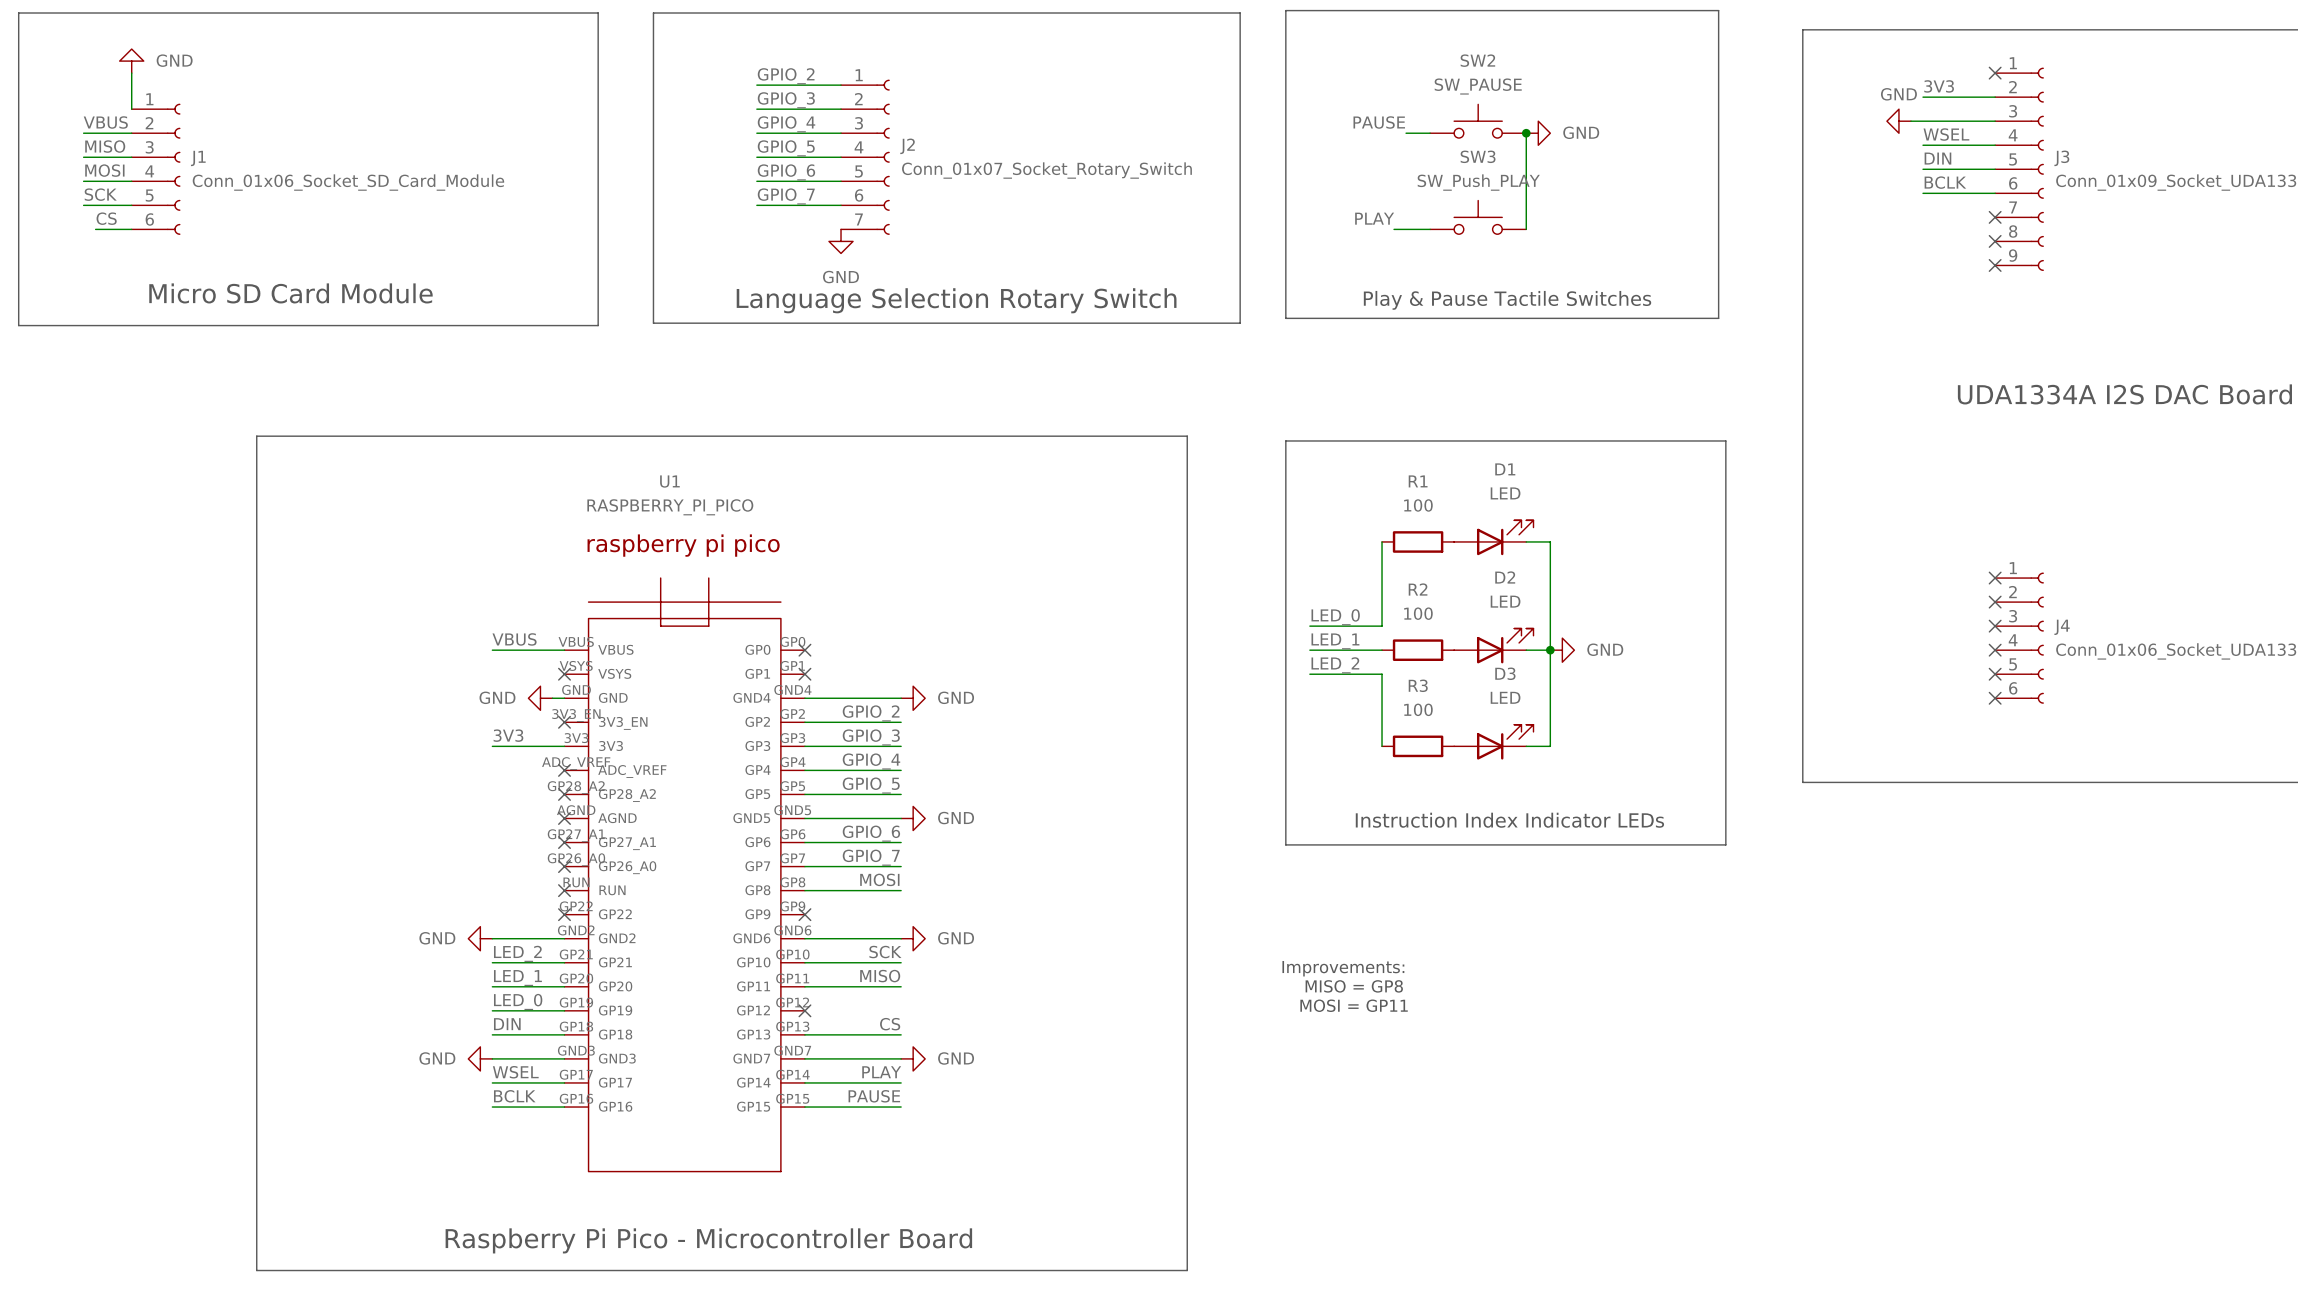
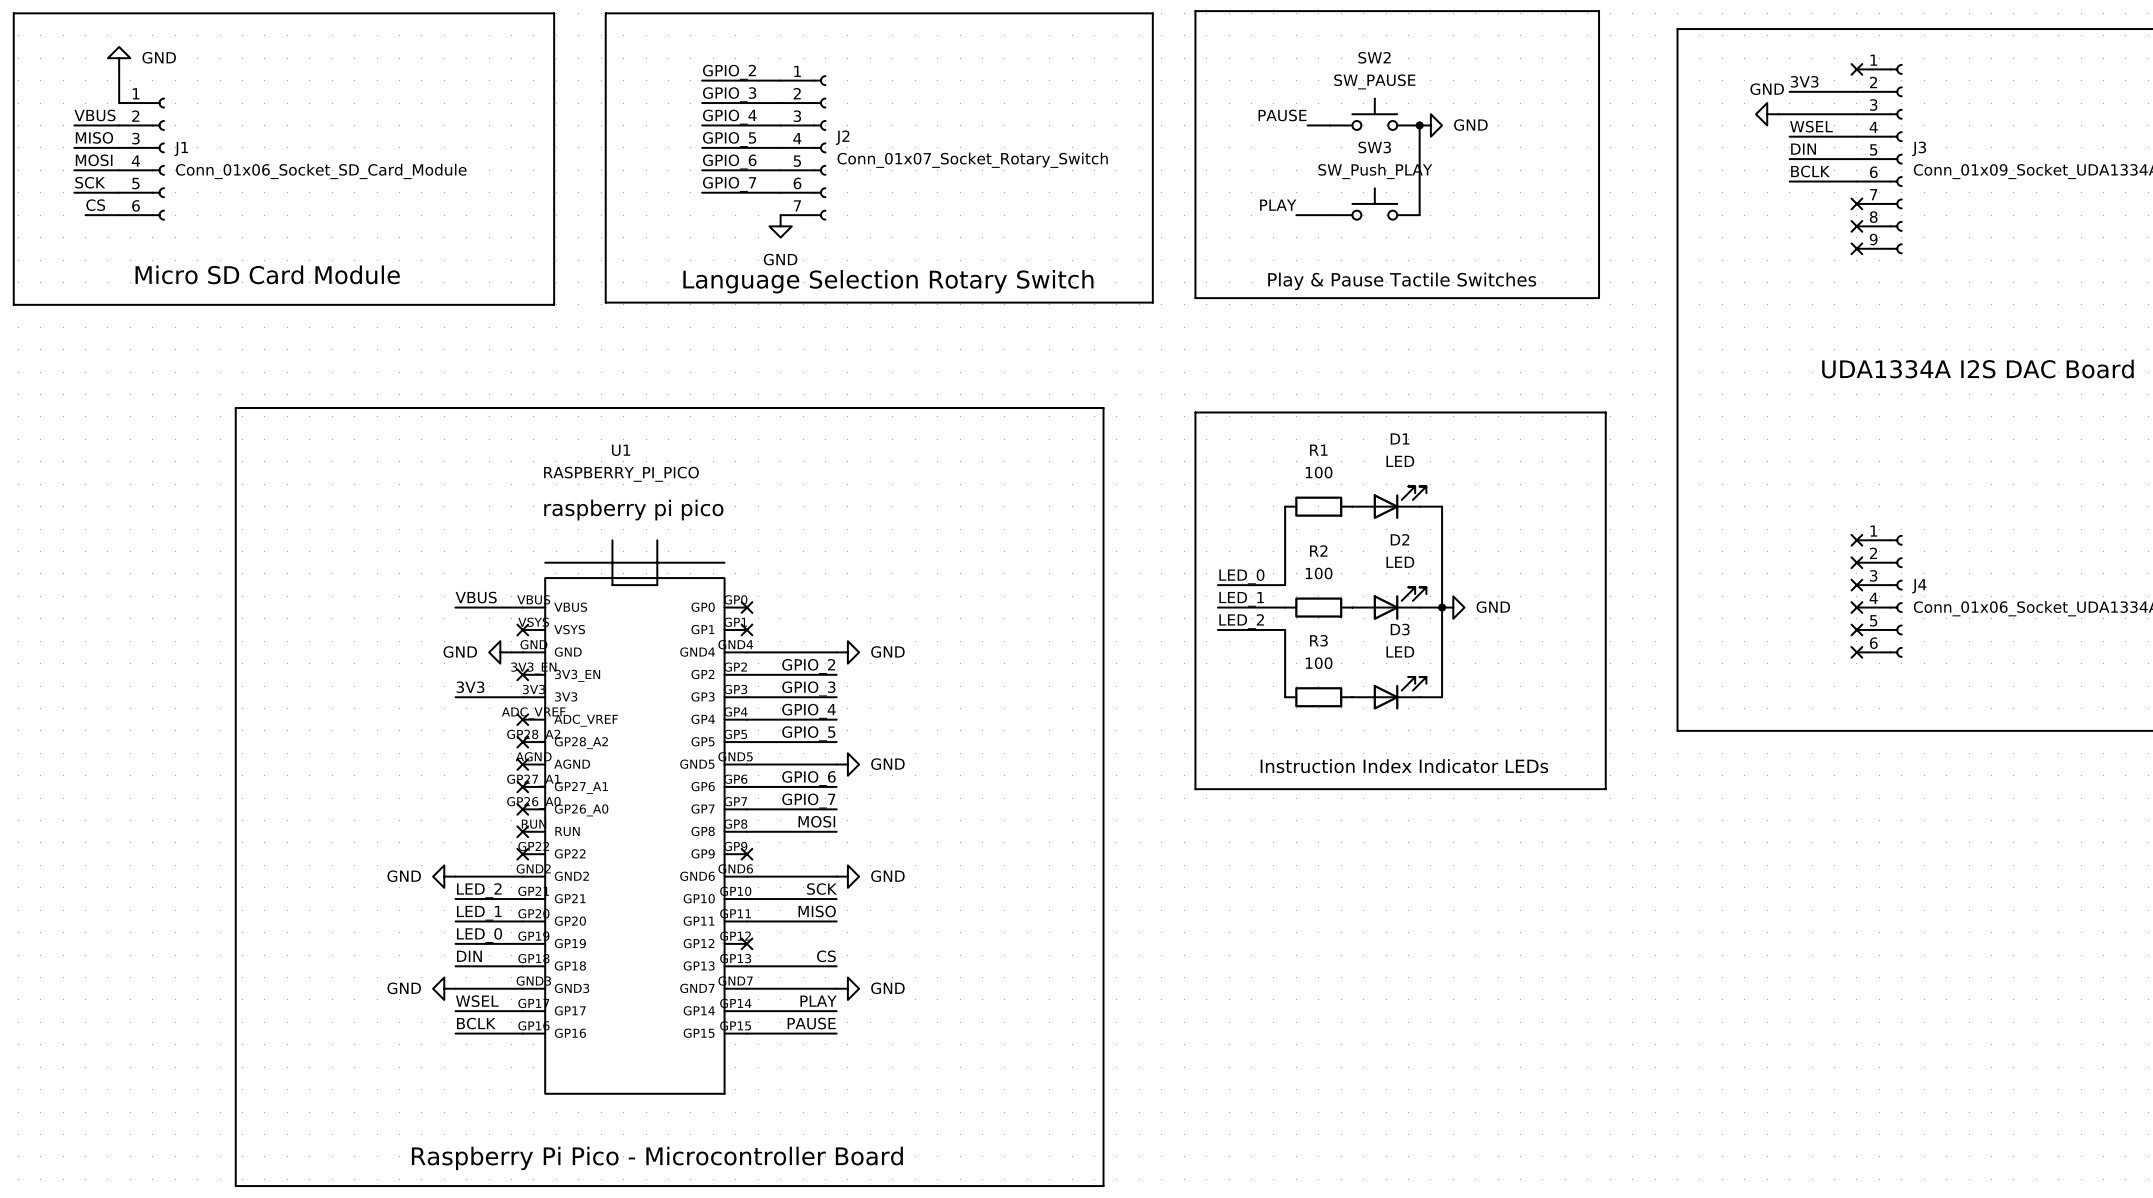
text: Improvements: (1343, 968) -> none
text: MISO = GP8 (1354, 986) -> none
text: MOSI = GP11 (1354, 1005) -> none

